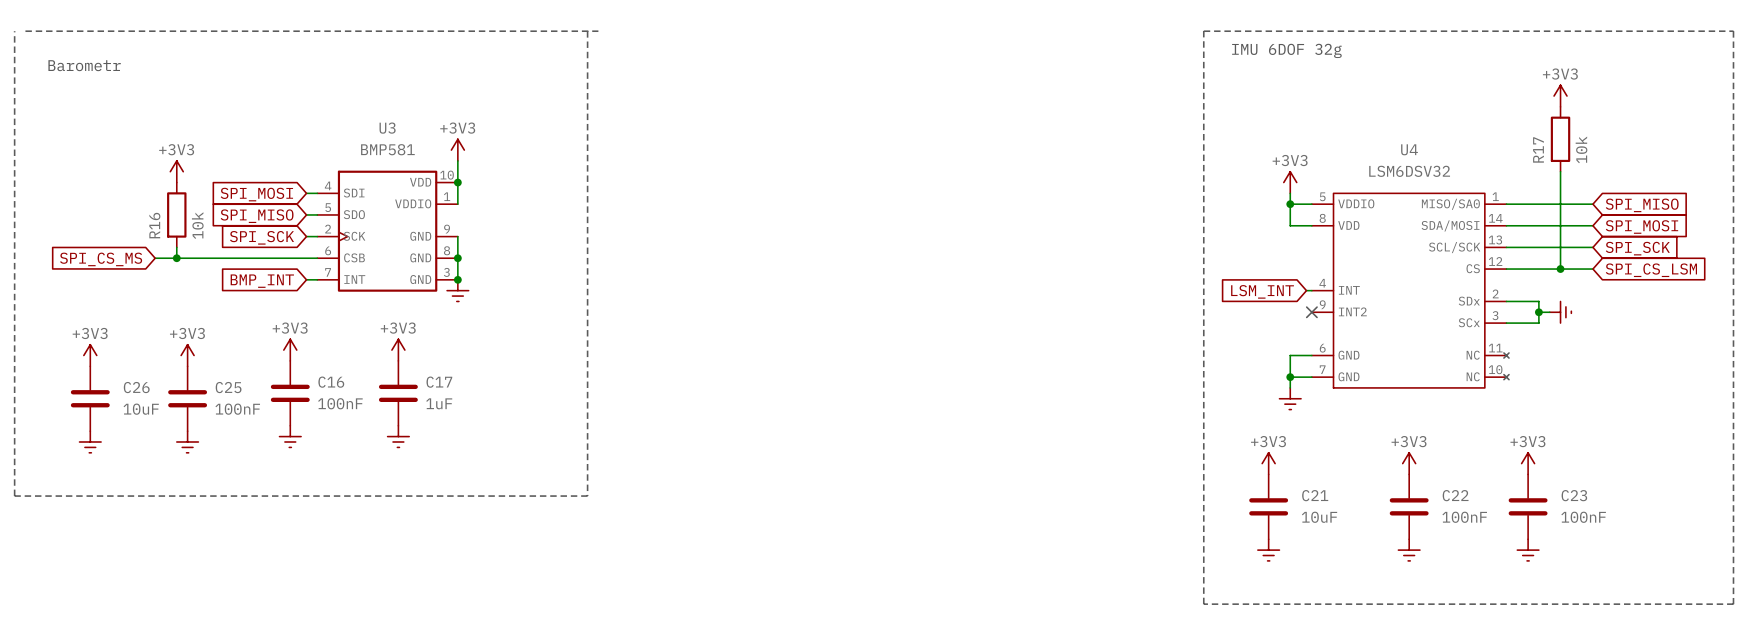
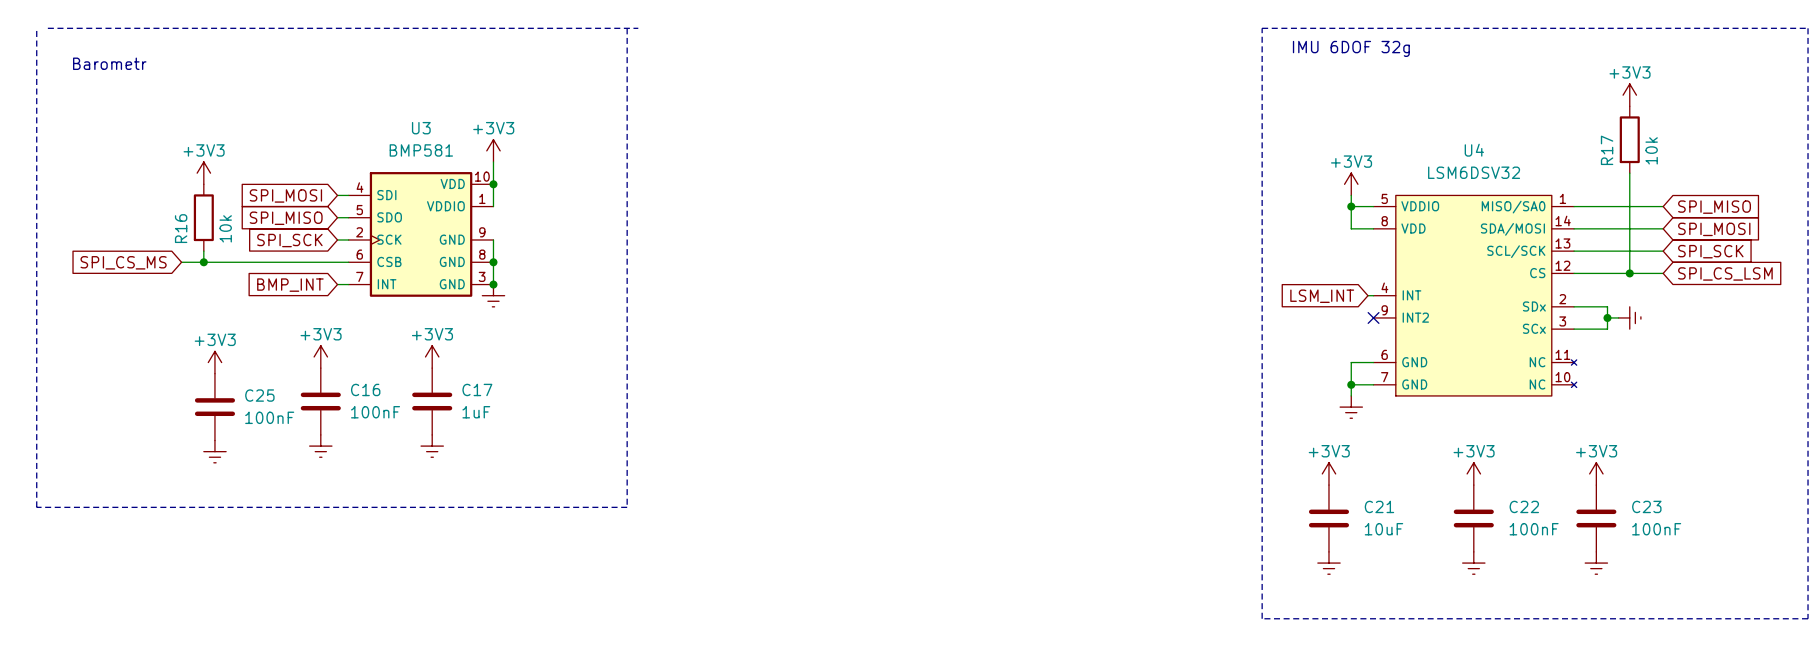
power symbol: +3V3 (90, 355) -> none
C26: 10uF (90, 398) -> none
power symbol: (90, 441) -> none

